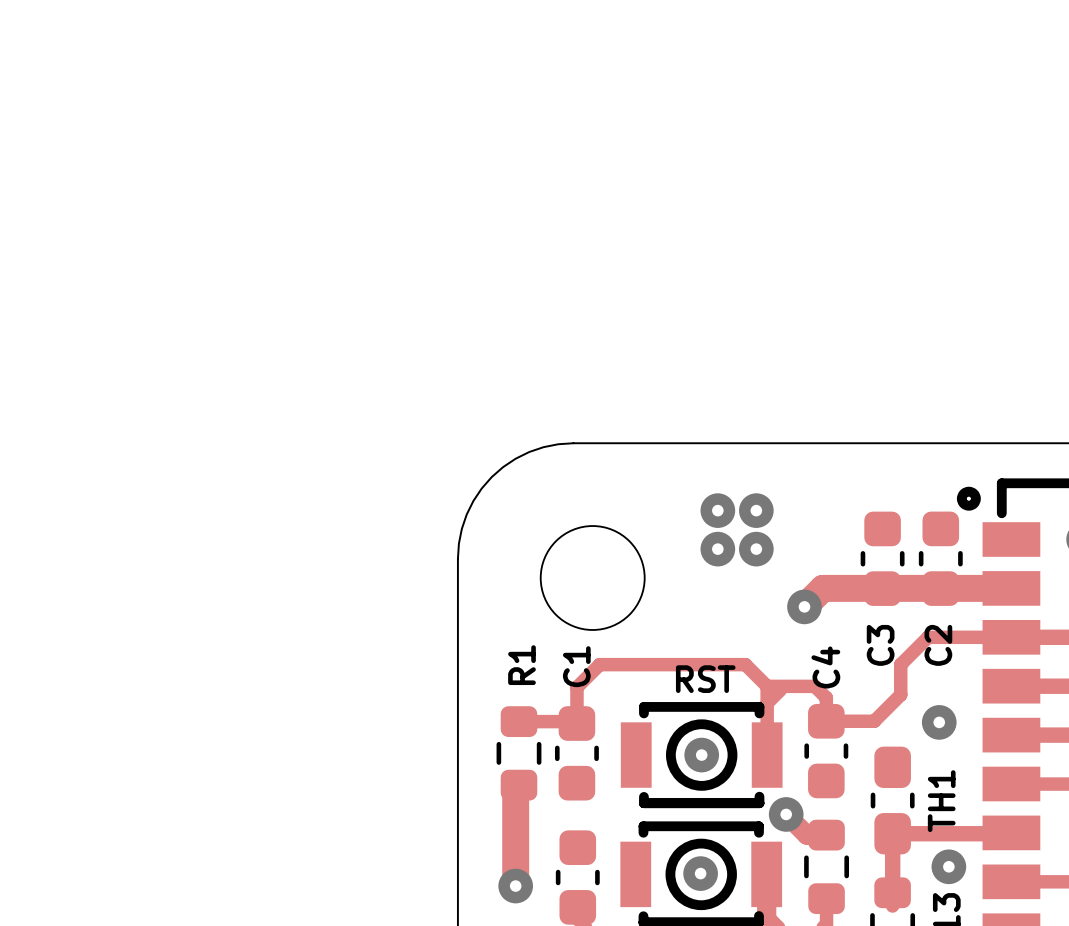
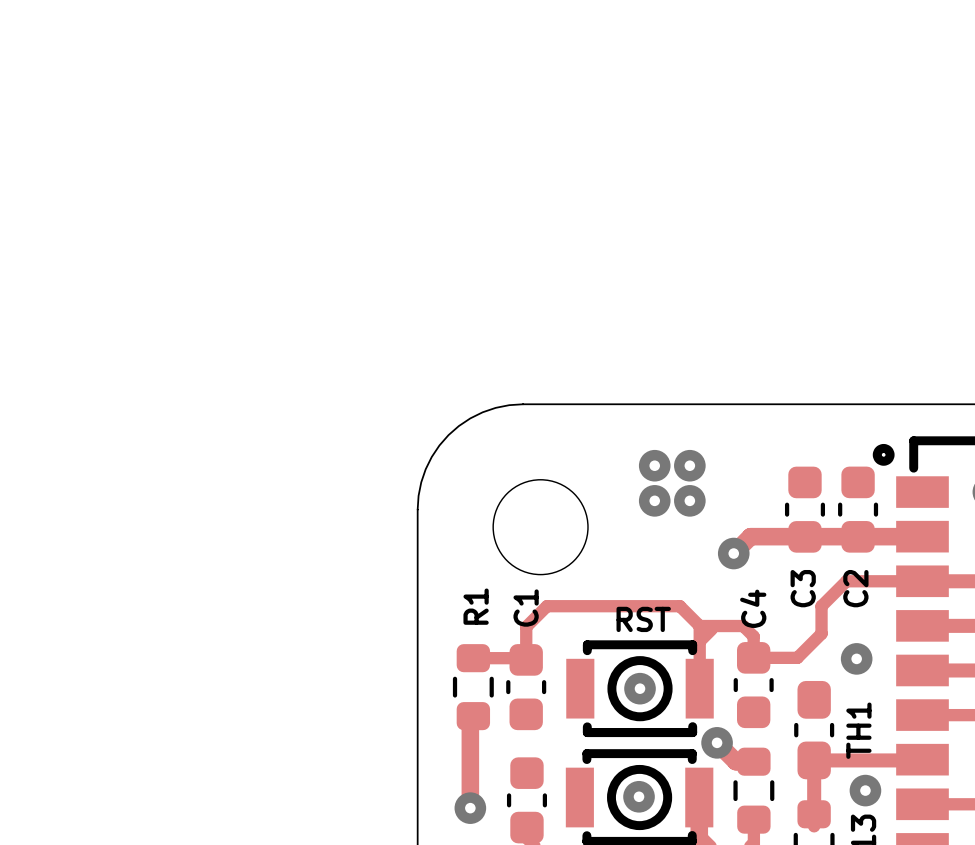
track width: thick (1011, 588) (822, 588) (804, 606) -> thin (922, 536) (750, 536) (733, 553)
track width: thick (515, 788) (515, 886) -> thin (470, 719) (470, 808)

